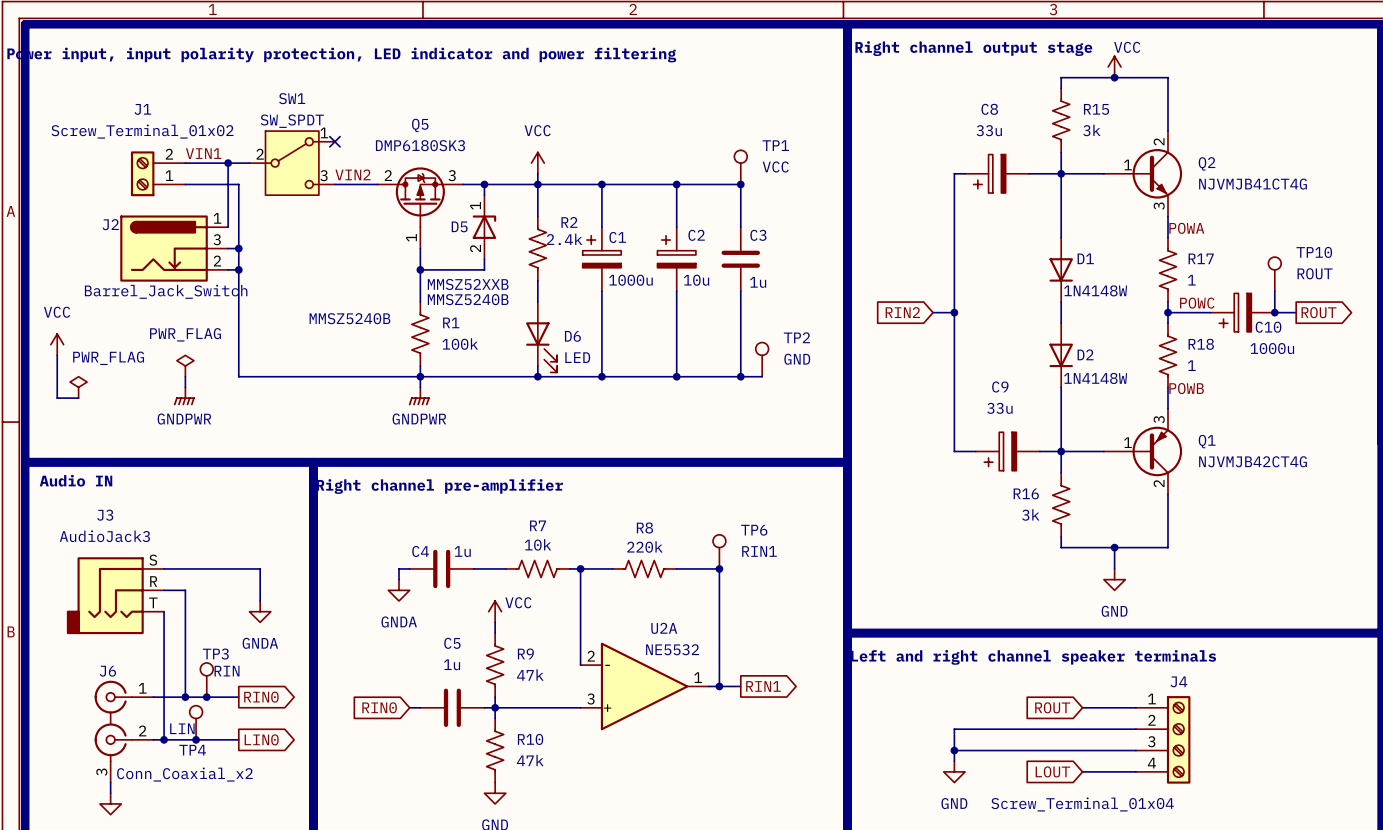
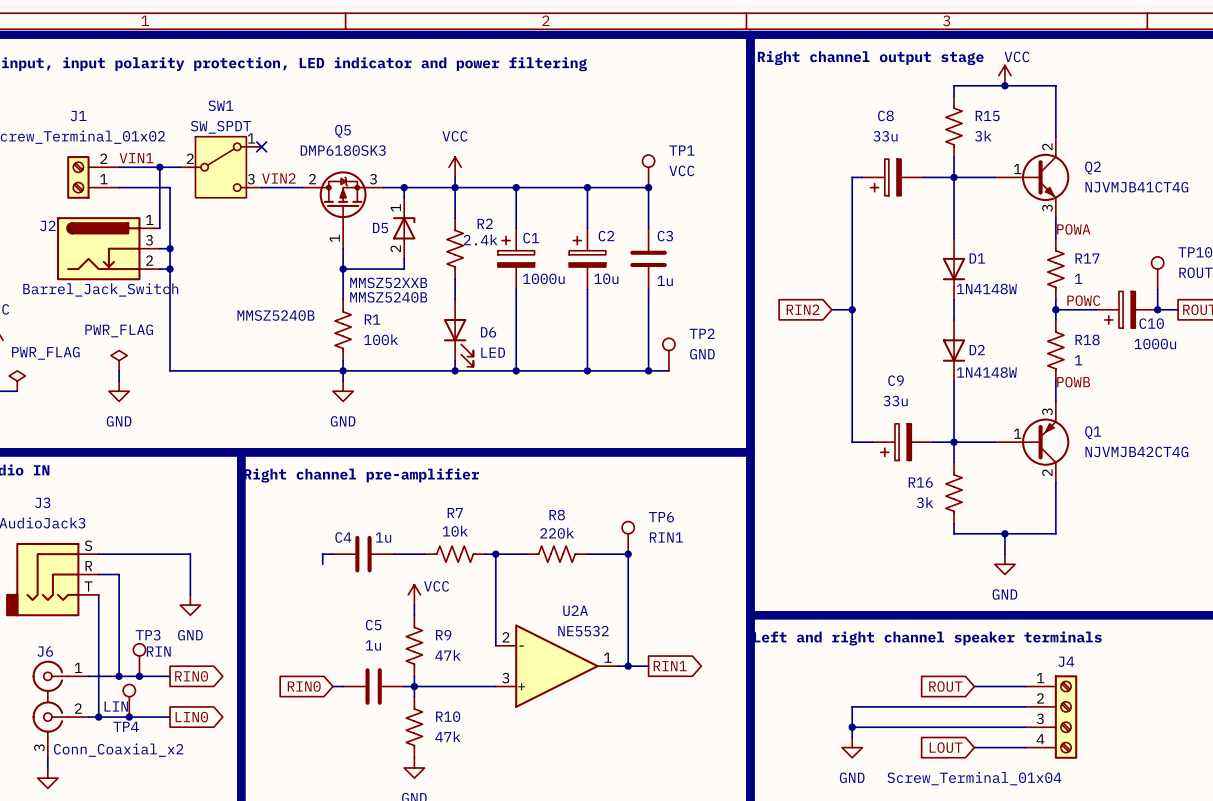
power symbol: GNDPWR (184, 396) -> GND (119, 391)
power symbol: GNDPWR (419, 396) -> GND (343, 391)
power symbol: GNDA (399, 590) -> none
power symbol: GNDA (260, 611) -> none
power symbol: none -> GND (190, 605)

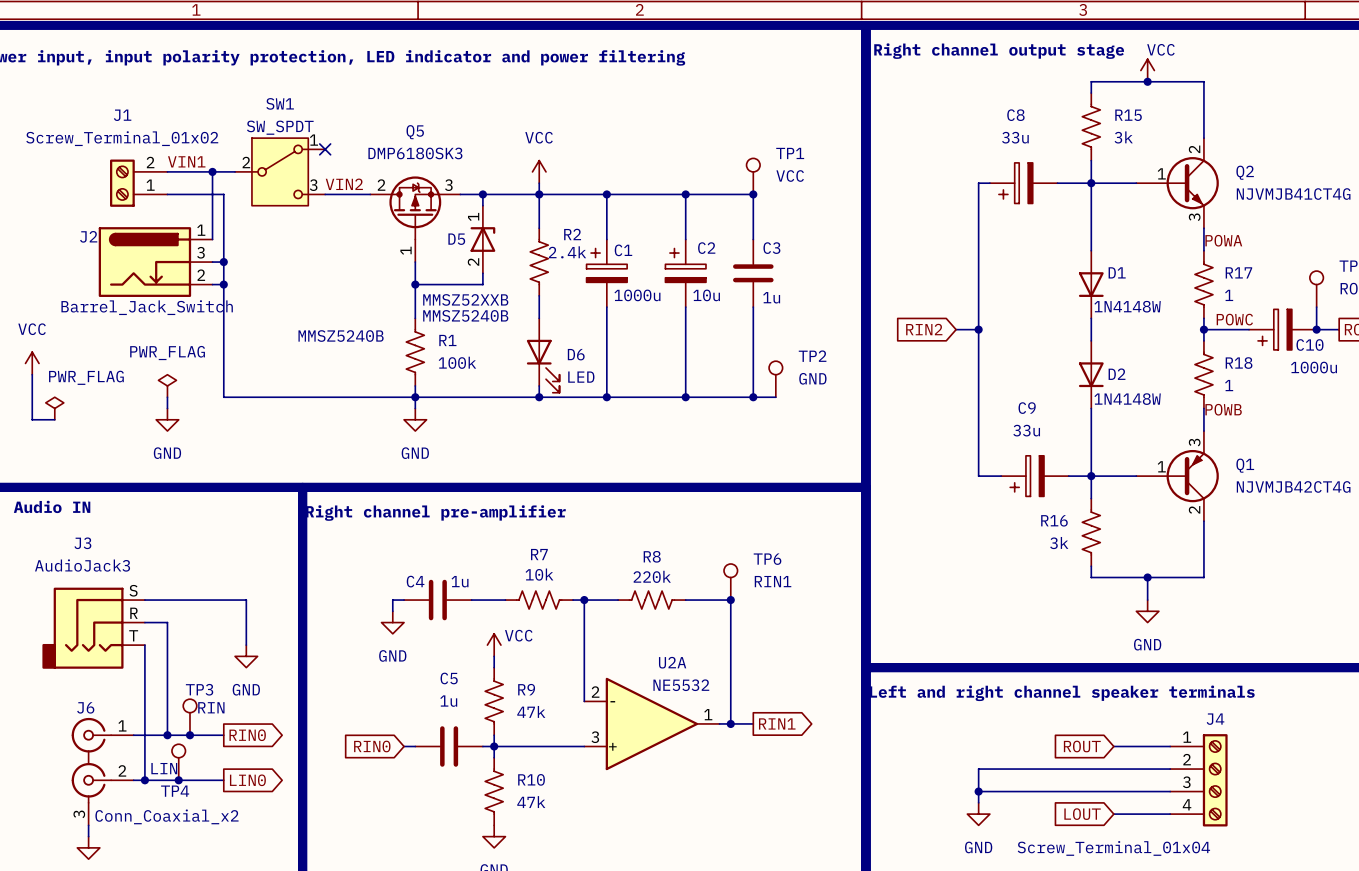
power symbol: none -> GND (392, 622)

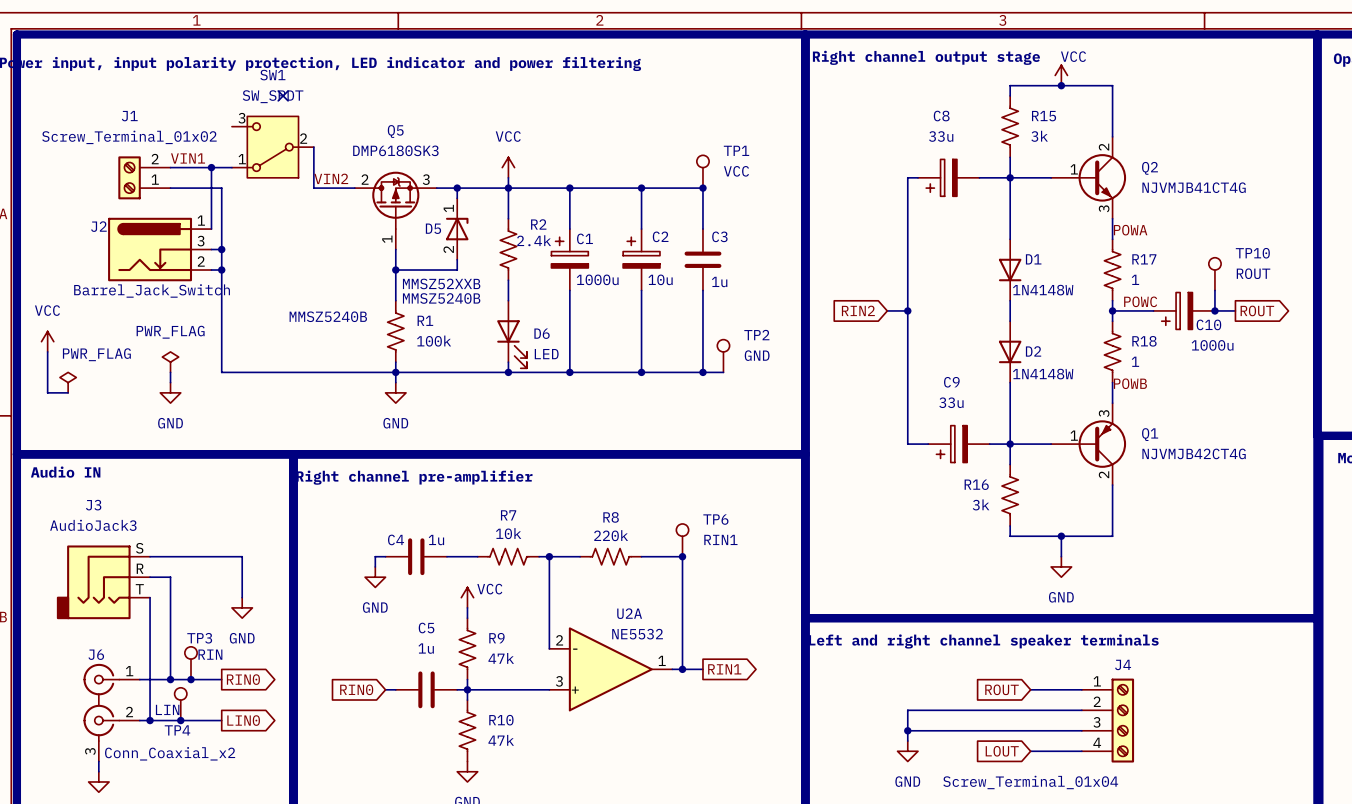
no-connect mark: none -> (283, 95)
wire: none -> (313, 147) (313, 188)
no-connect mark: (325, 149) -> none
SW1 rotation: 0° (280, 171) -> 180° (272, 147)

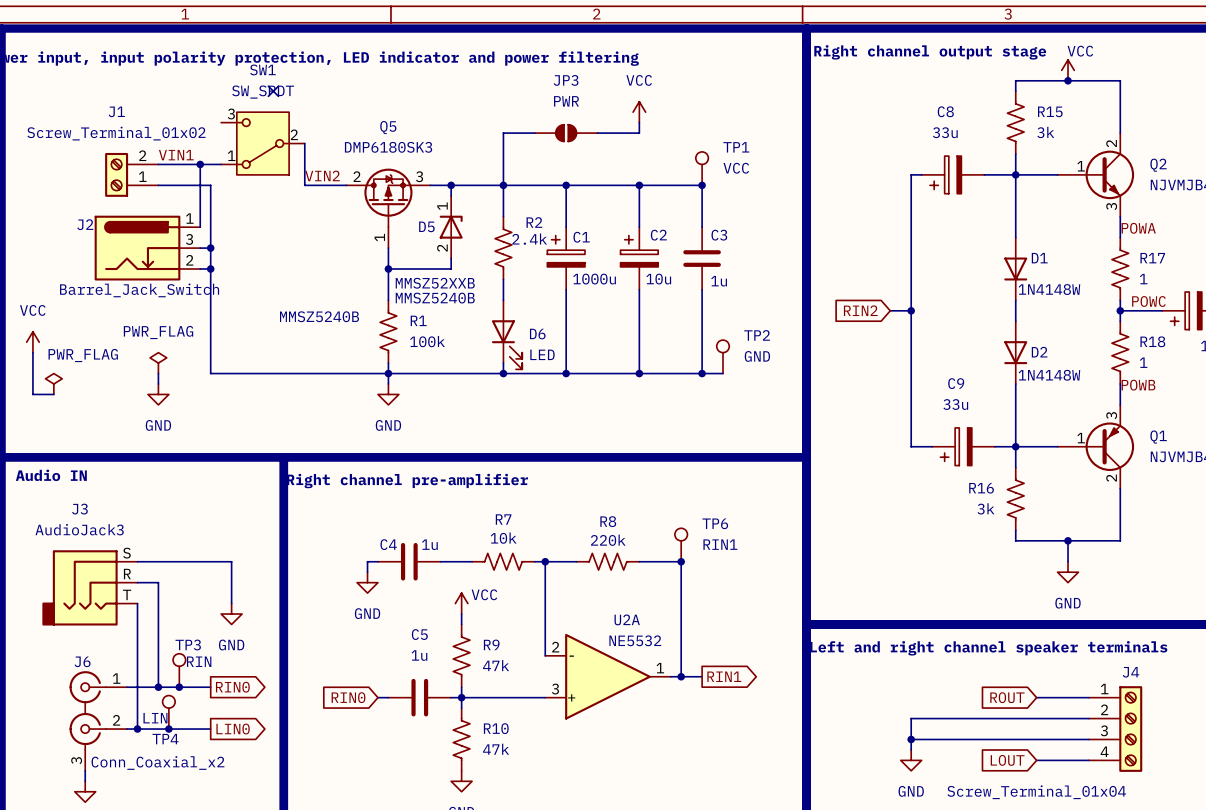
wire: none -> (639, 122) (639, 133) (597, 133)
wire: none -> (534, 133) (503, 133) (503, 174)
JP3: none -> PWR (566, 133)
power symbol position: VCC (508, 167) -> VCC (639, 112)

